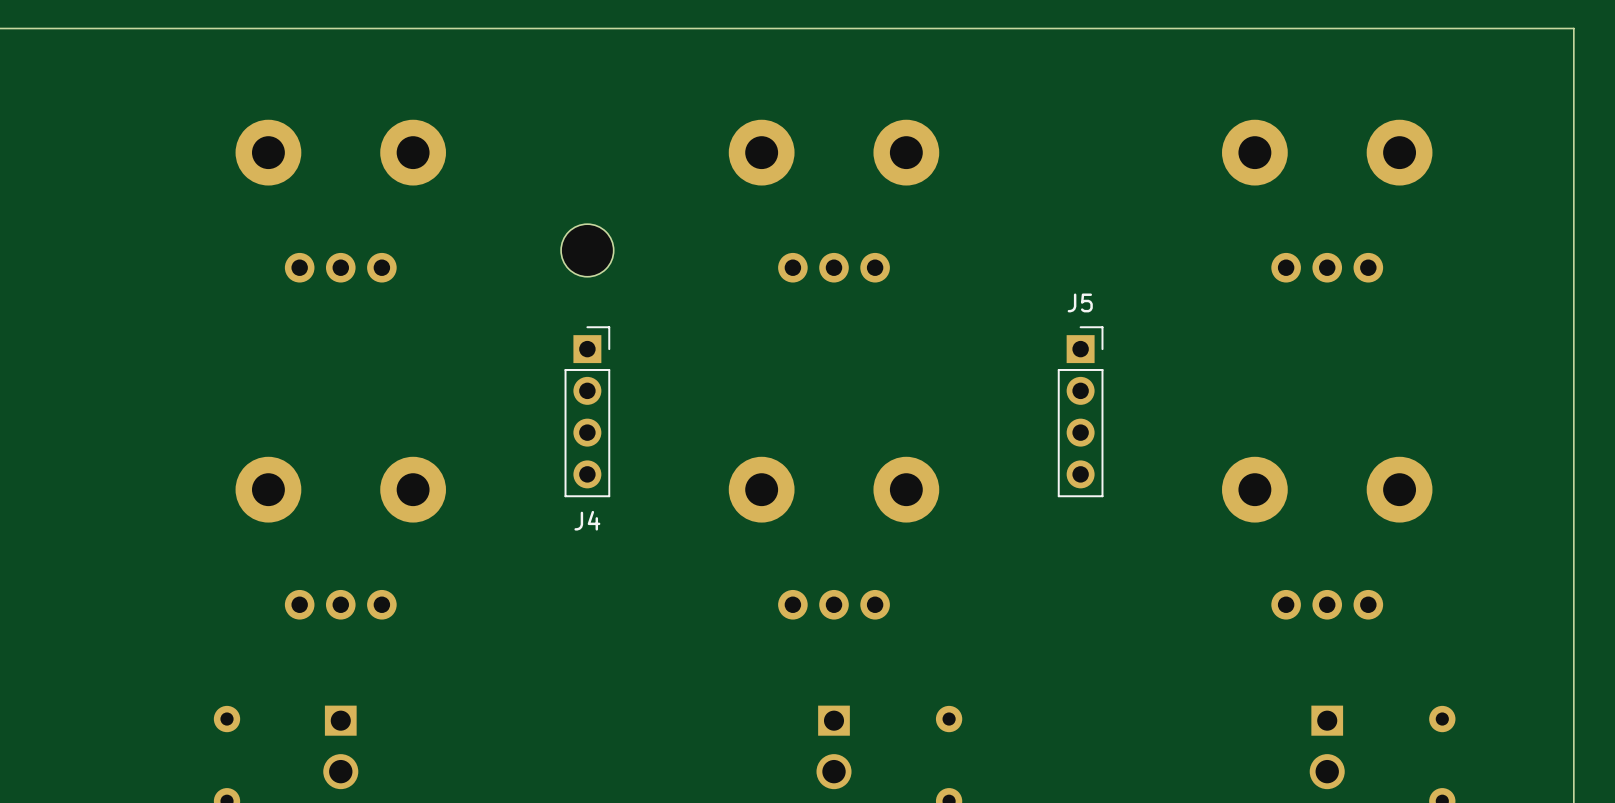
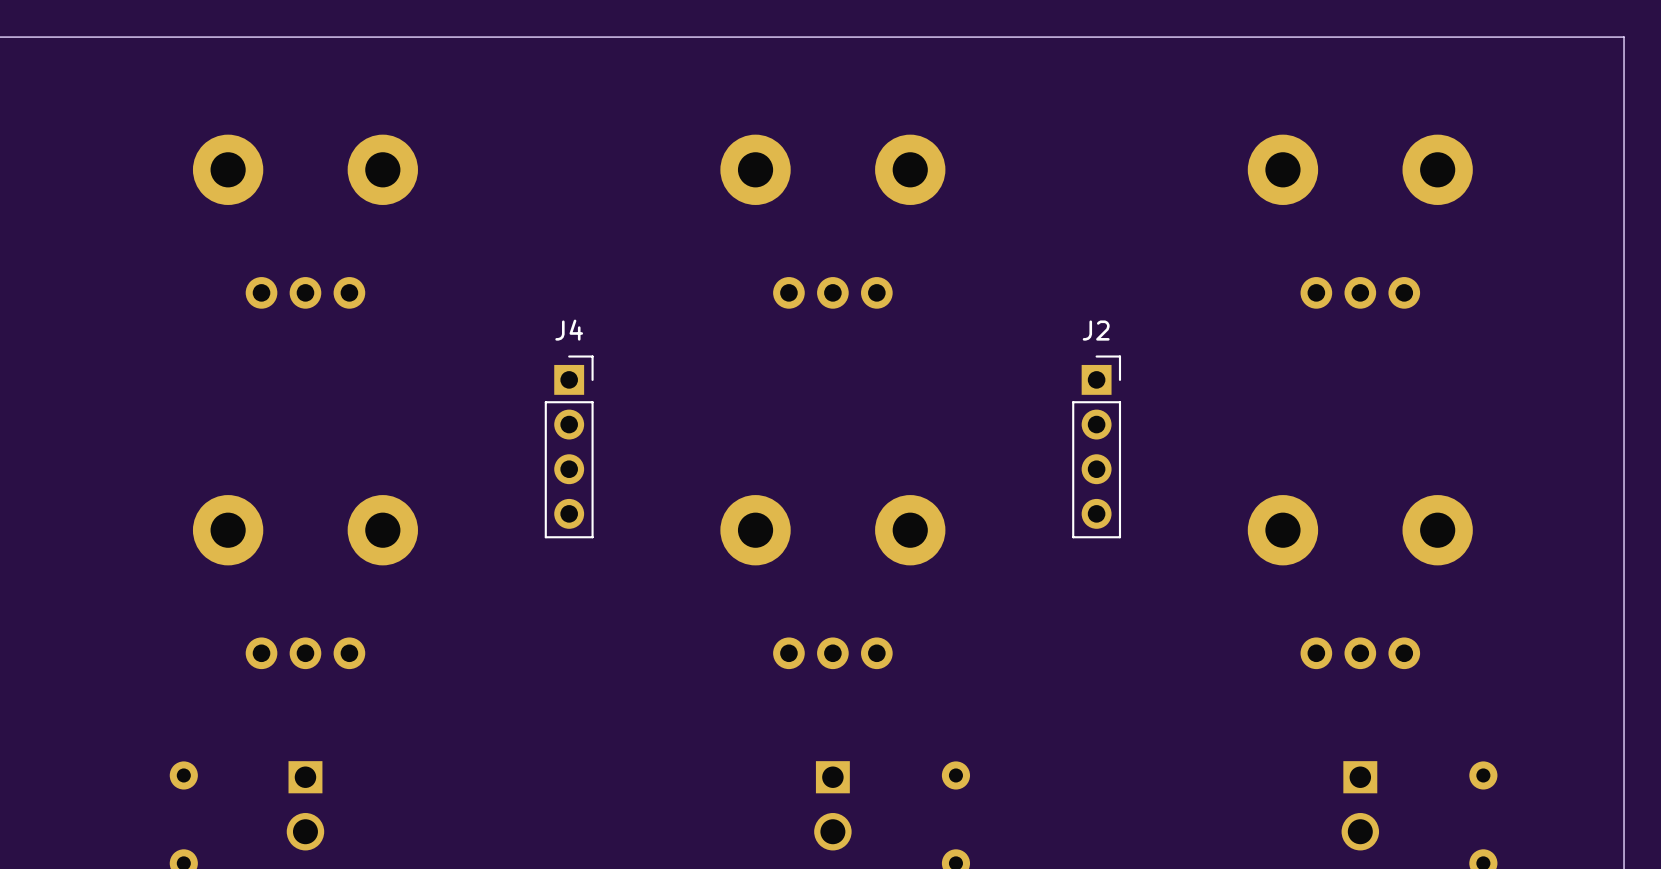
part: (587, 250) -> none
J5 name: J5 (1080, 302) -> J2 (1096, 330)
J4 name position: J4 (587, 520) -> J4 (569, 330)

